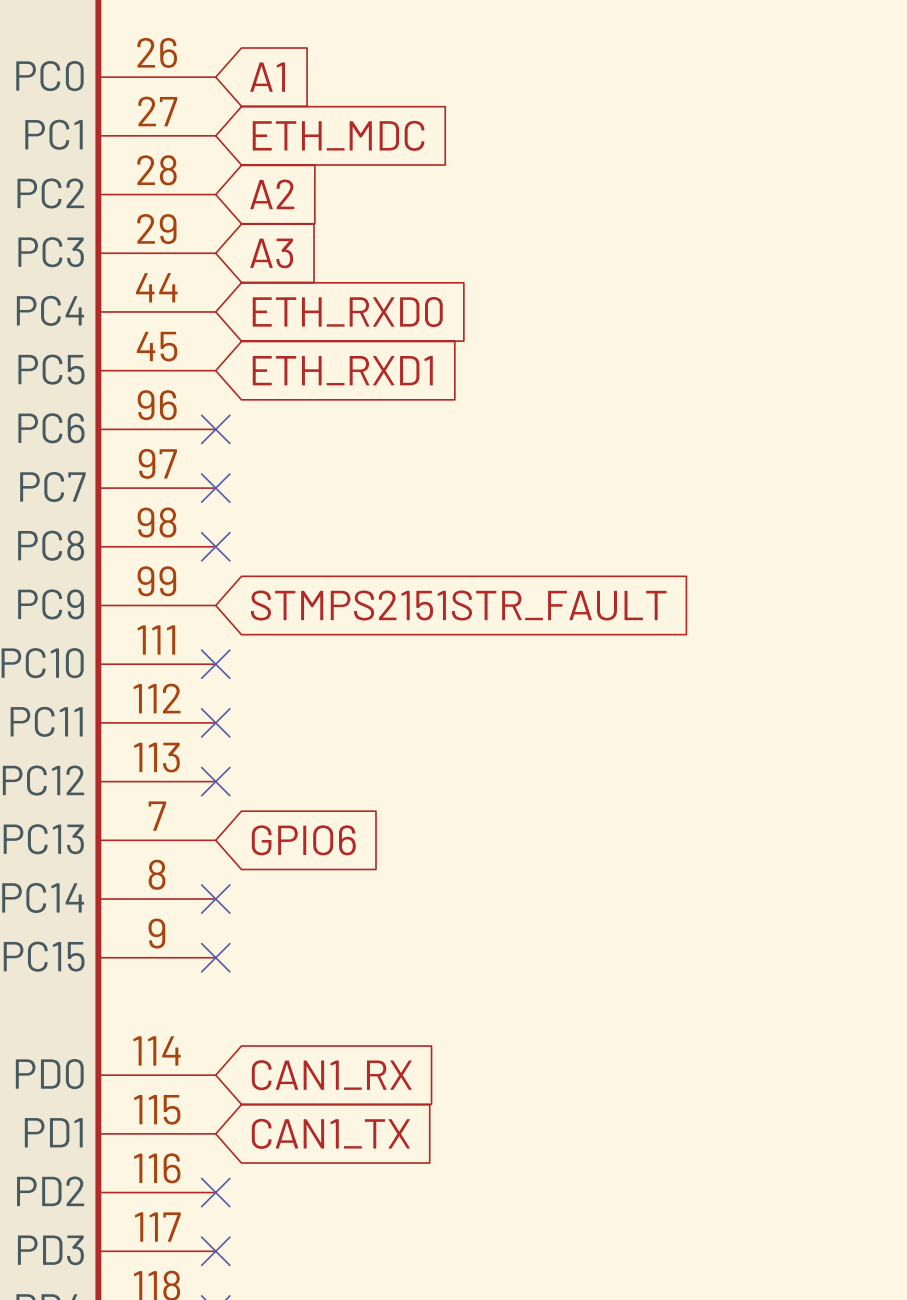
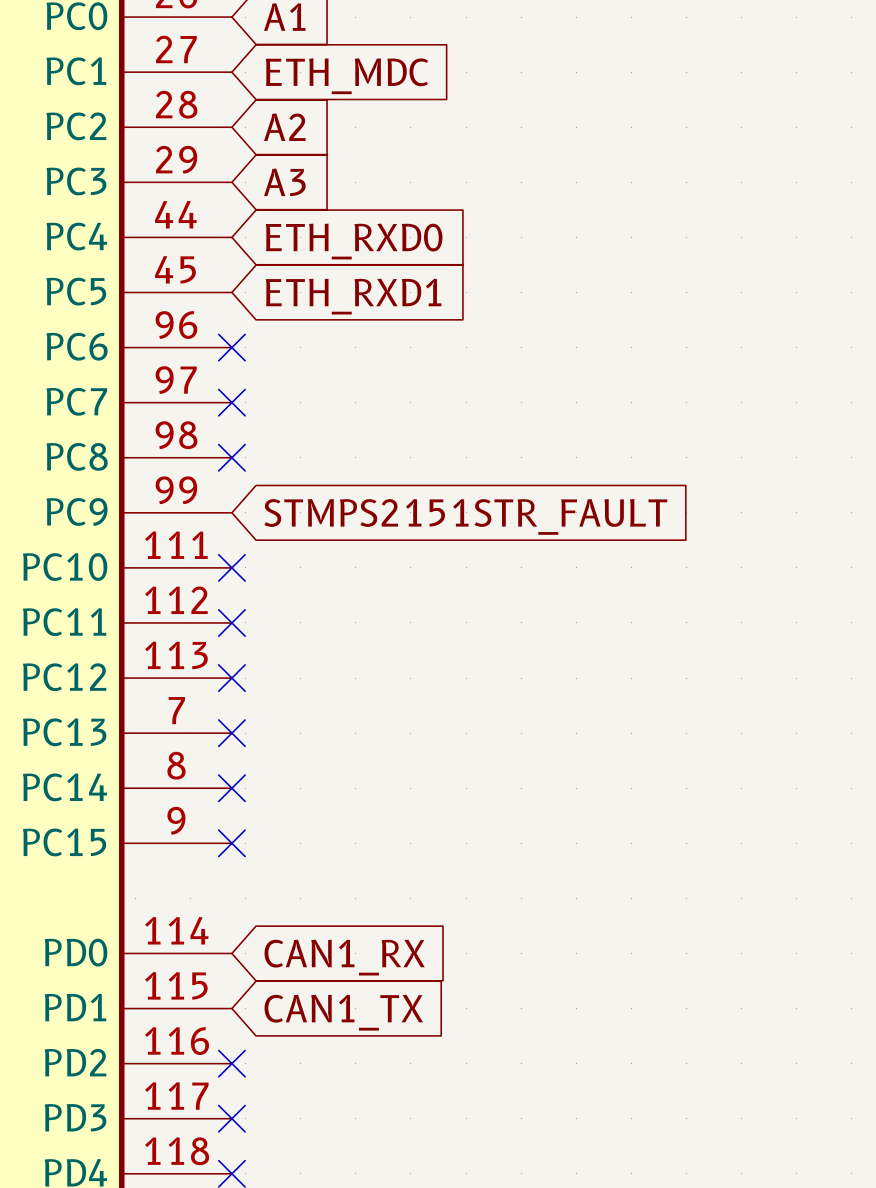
no-connect mark: none -> (231, 733)
global label: GPIO6 (303, 840) -> none

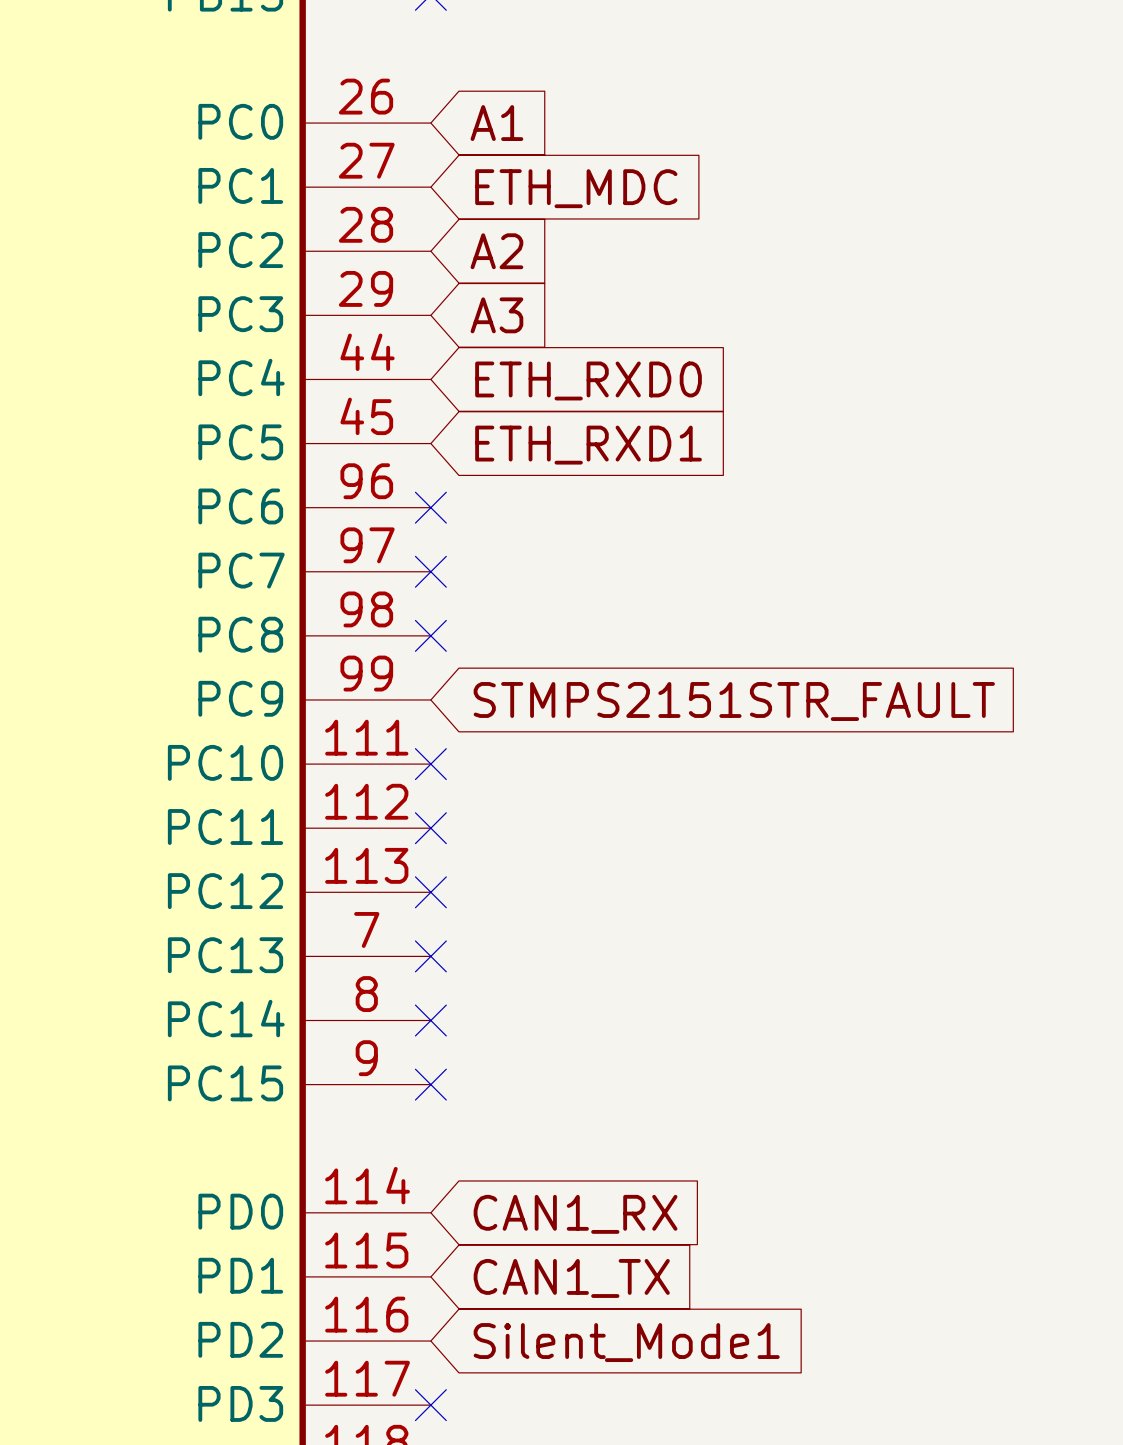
no-connect mark: (231, 1063) -> none
global label: none -> Silent_Mode1 (626, 1342)

